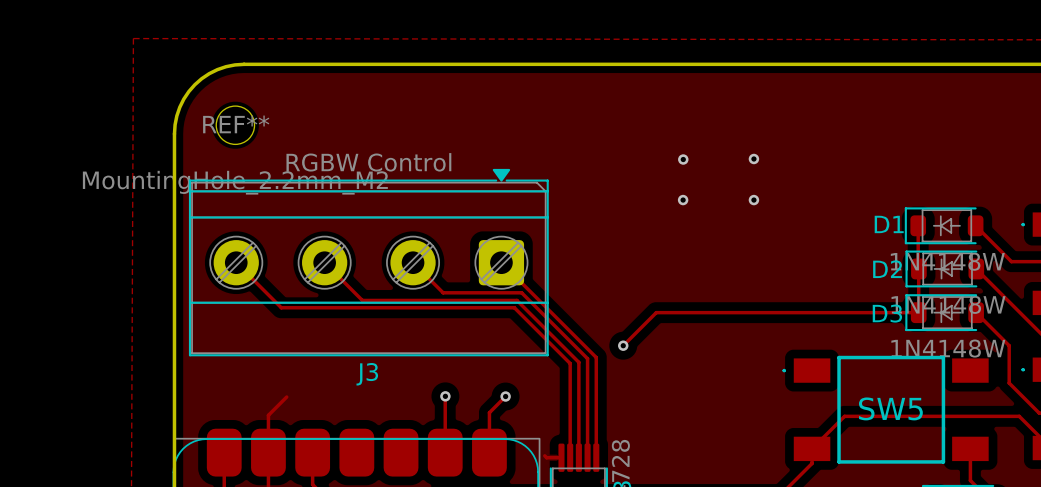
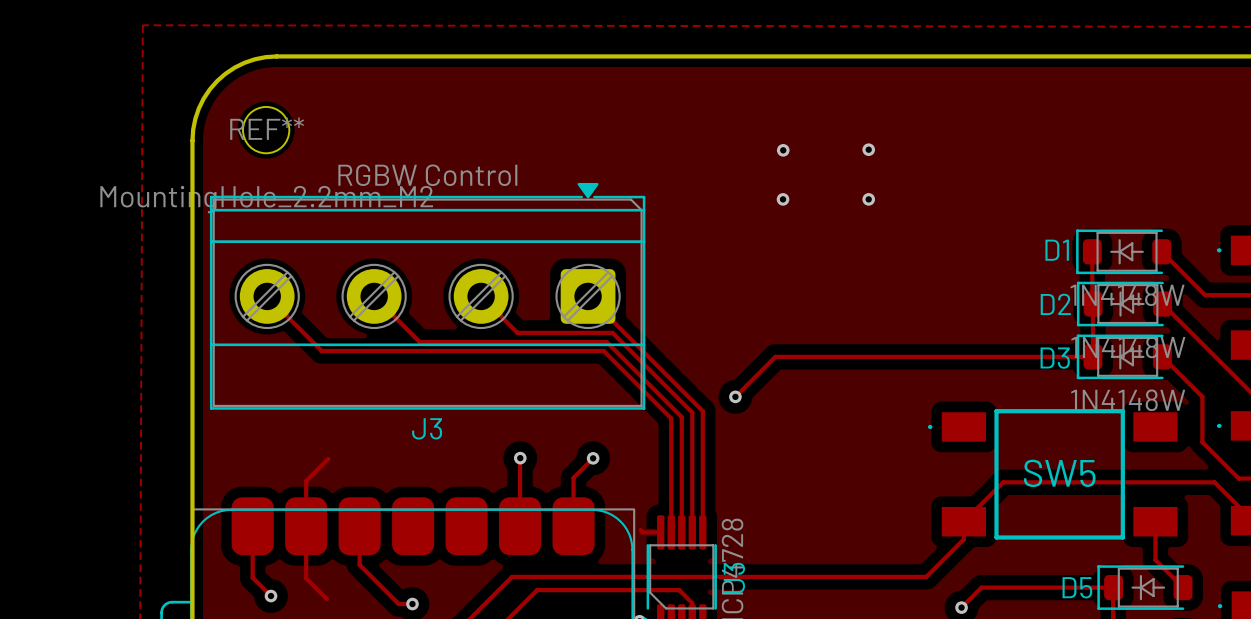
via: none -> (783, 150)
via: none -> (868, 149)
via: (753, 158) -> none
via: (683, 159) -> none
via: none -> (783, 199)
via: none -> (868, 199)
via: (683, 200) -> none
via: (753, 200) -> none

